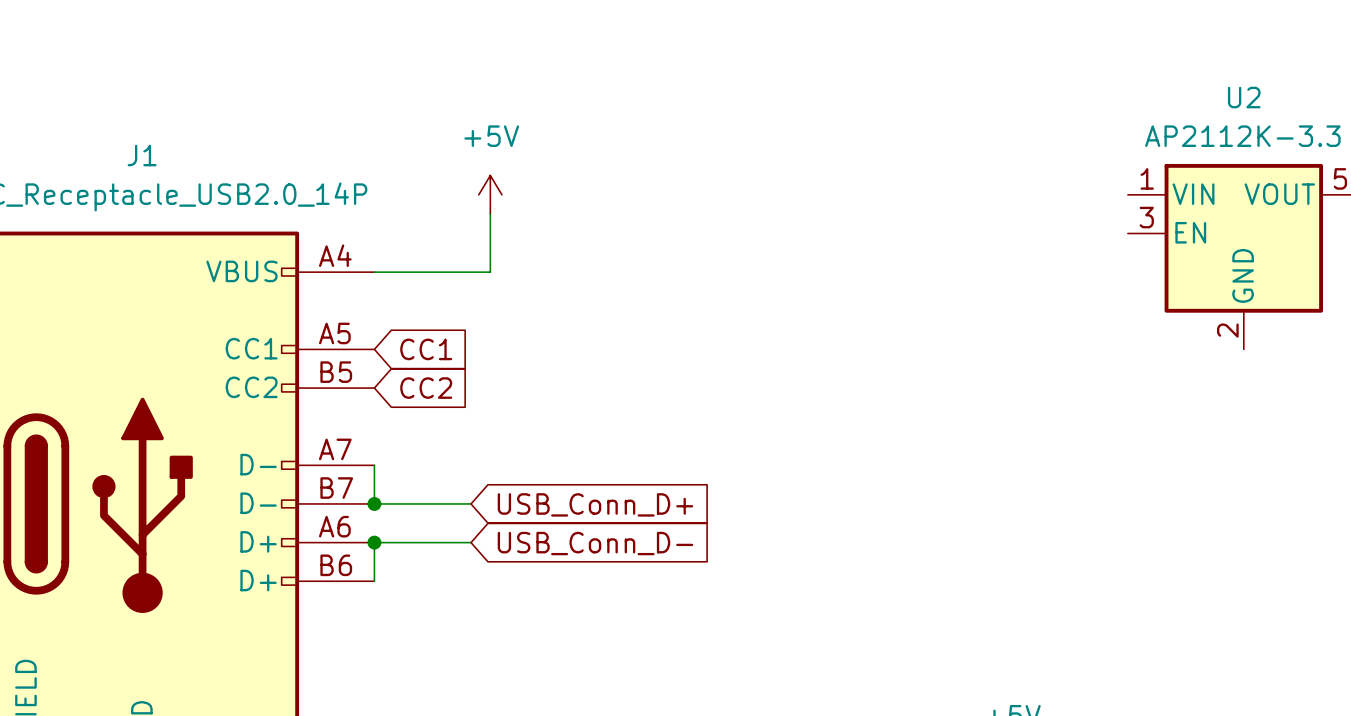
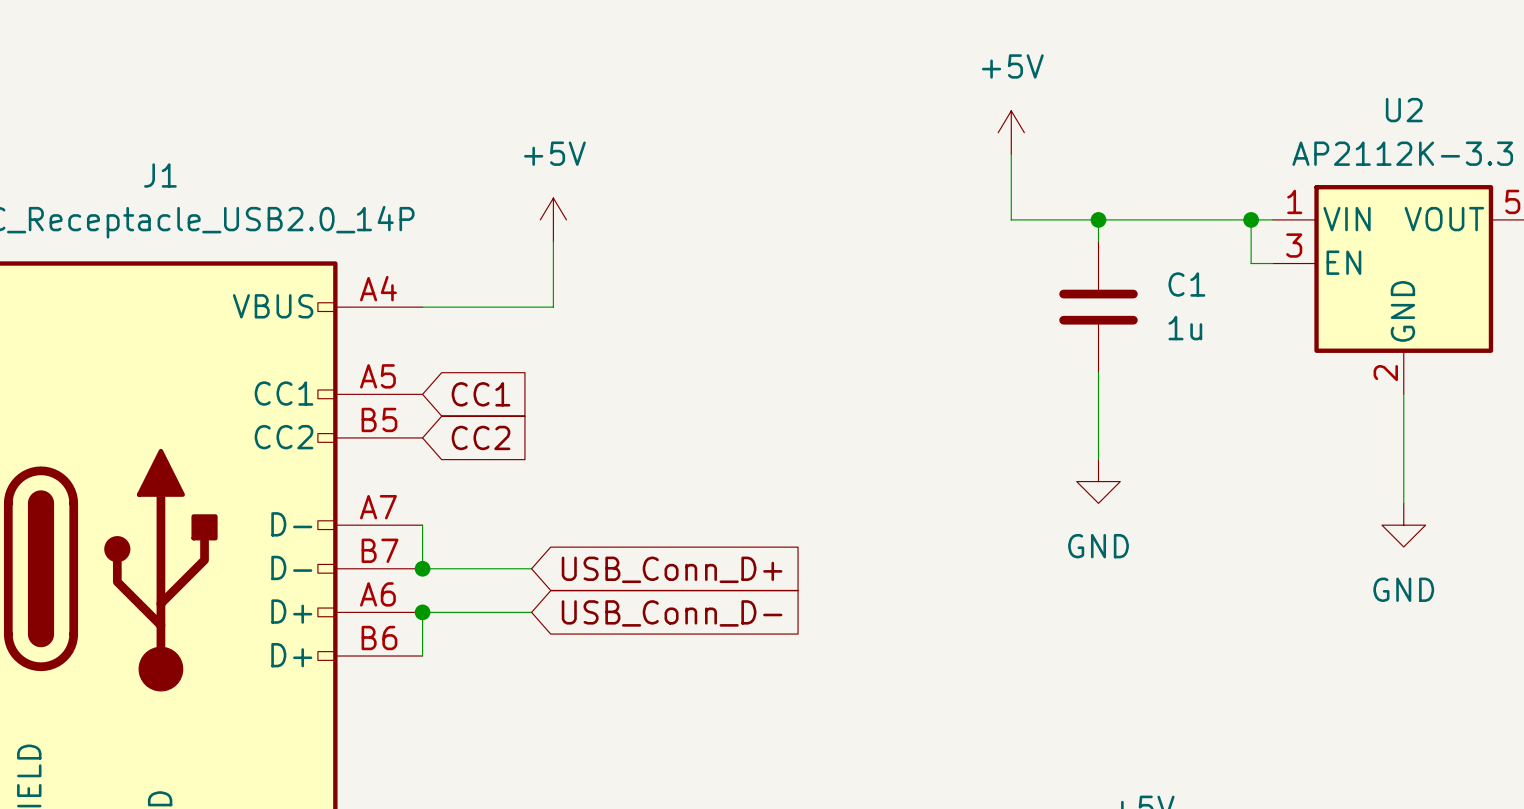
power symbol: none -> +5V (1011, 132)
wire: none -> (1011, 154) (1011, 219) (1272, 219)
wire: none -> (1098, 219) (1098, 241)
junction: none -> (1098, 219)
wire: none -> (1251, 219) (1251, 263) (1272, 263)
junction: none -> (1251, 219)
C1: none -> 1u (1098, 307)
wire: none -> (1098, 372) (1098, 459)
wire: none -> (1403, 394) (1403, 503)
power symbol: none -> GND (1098, 481)
power symbol: none -> GND (1403, 525)

